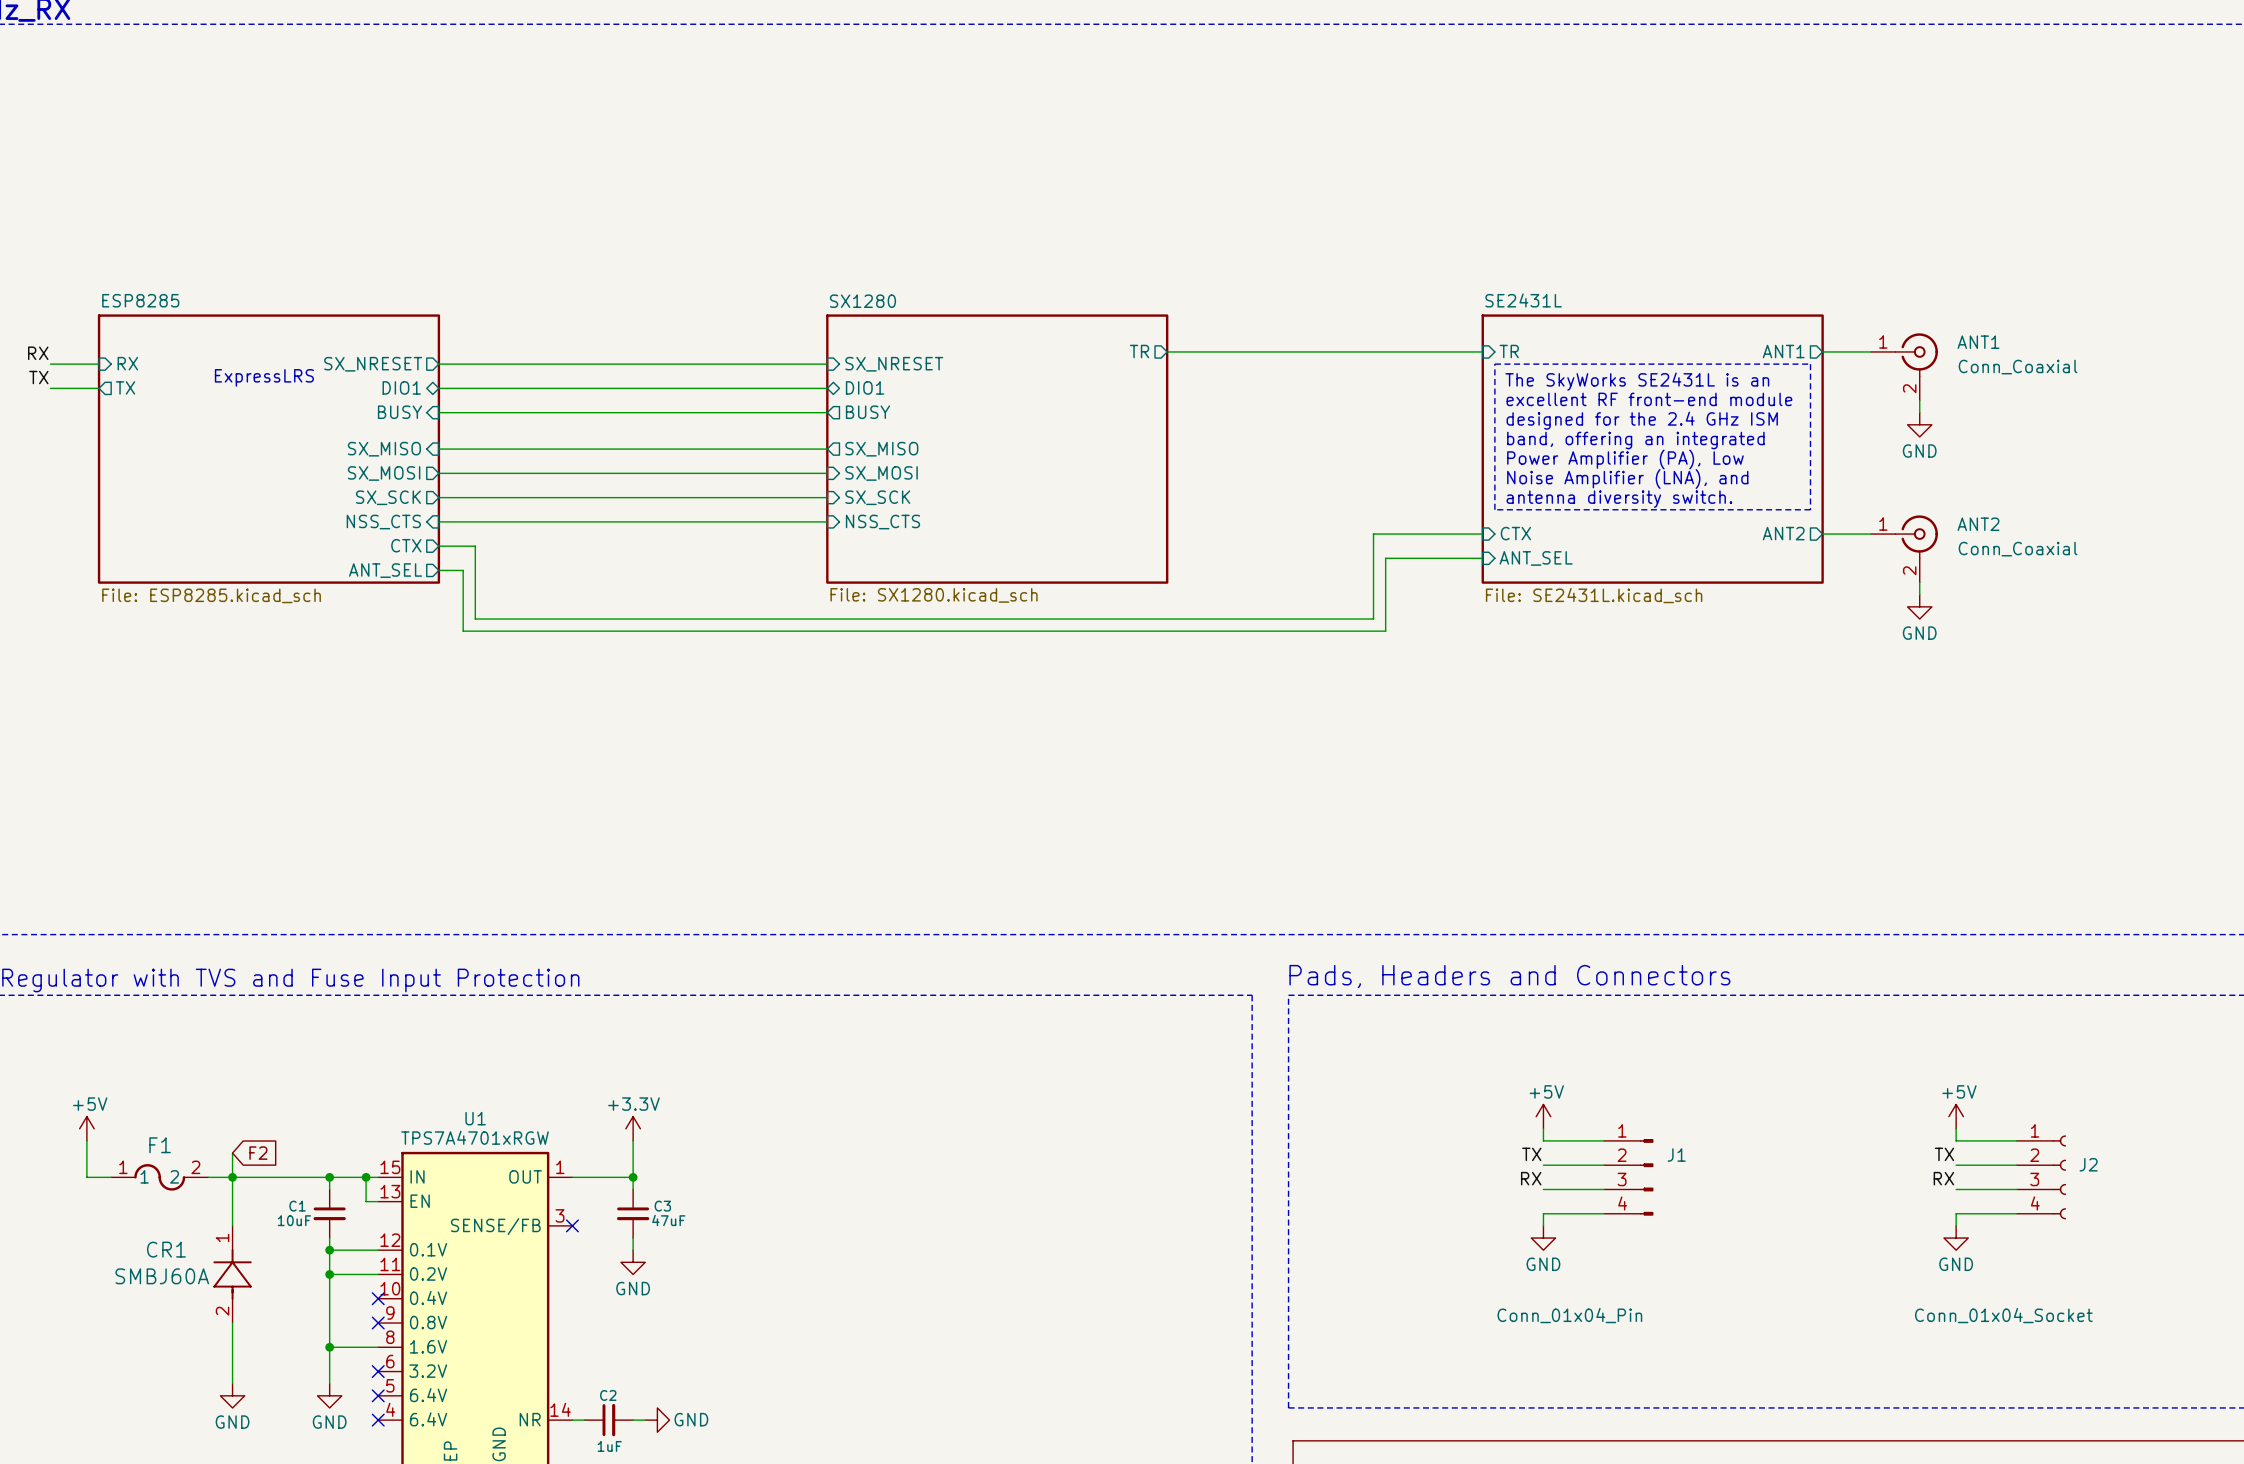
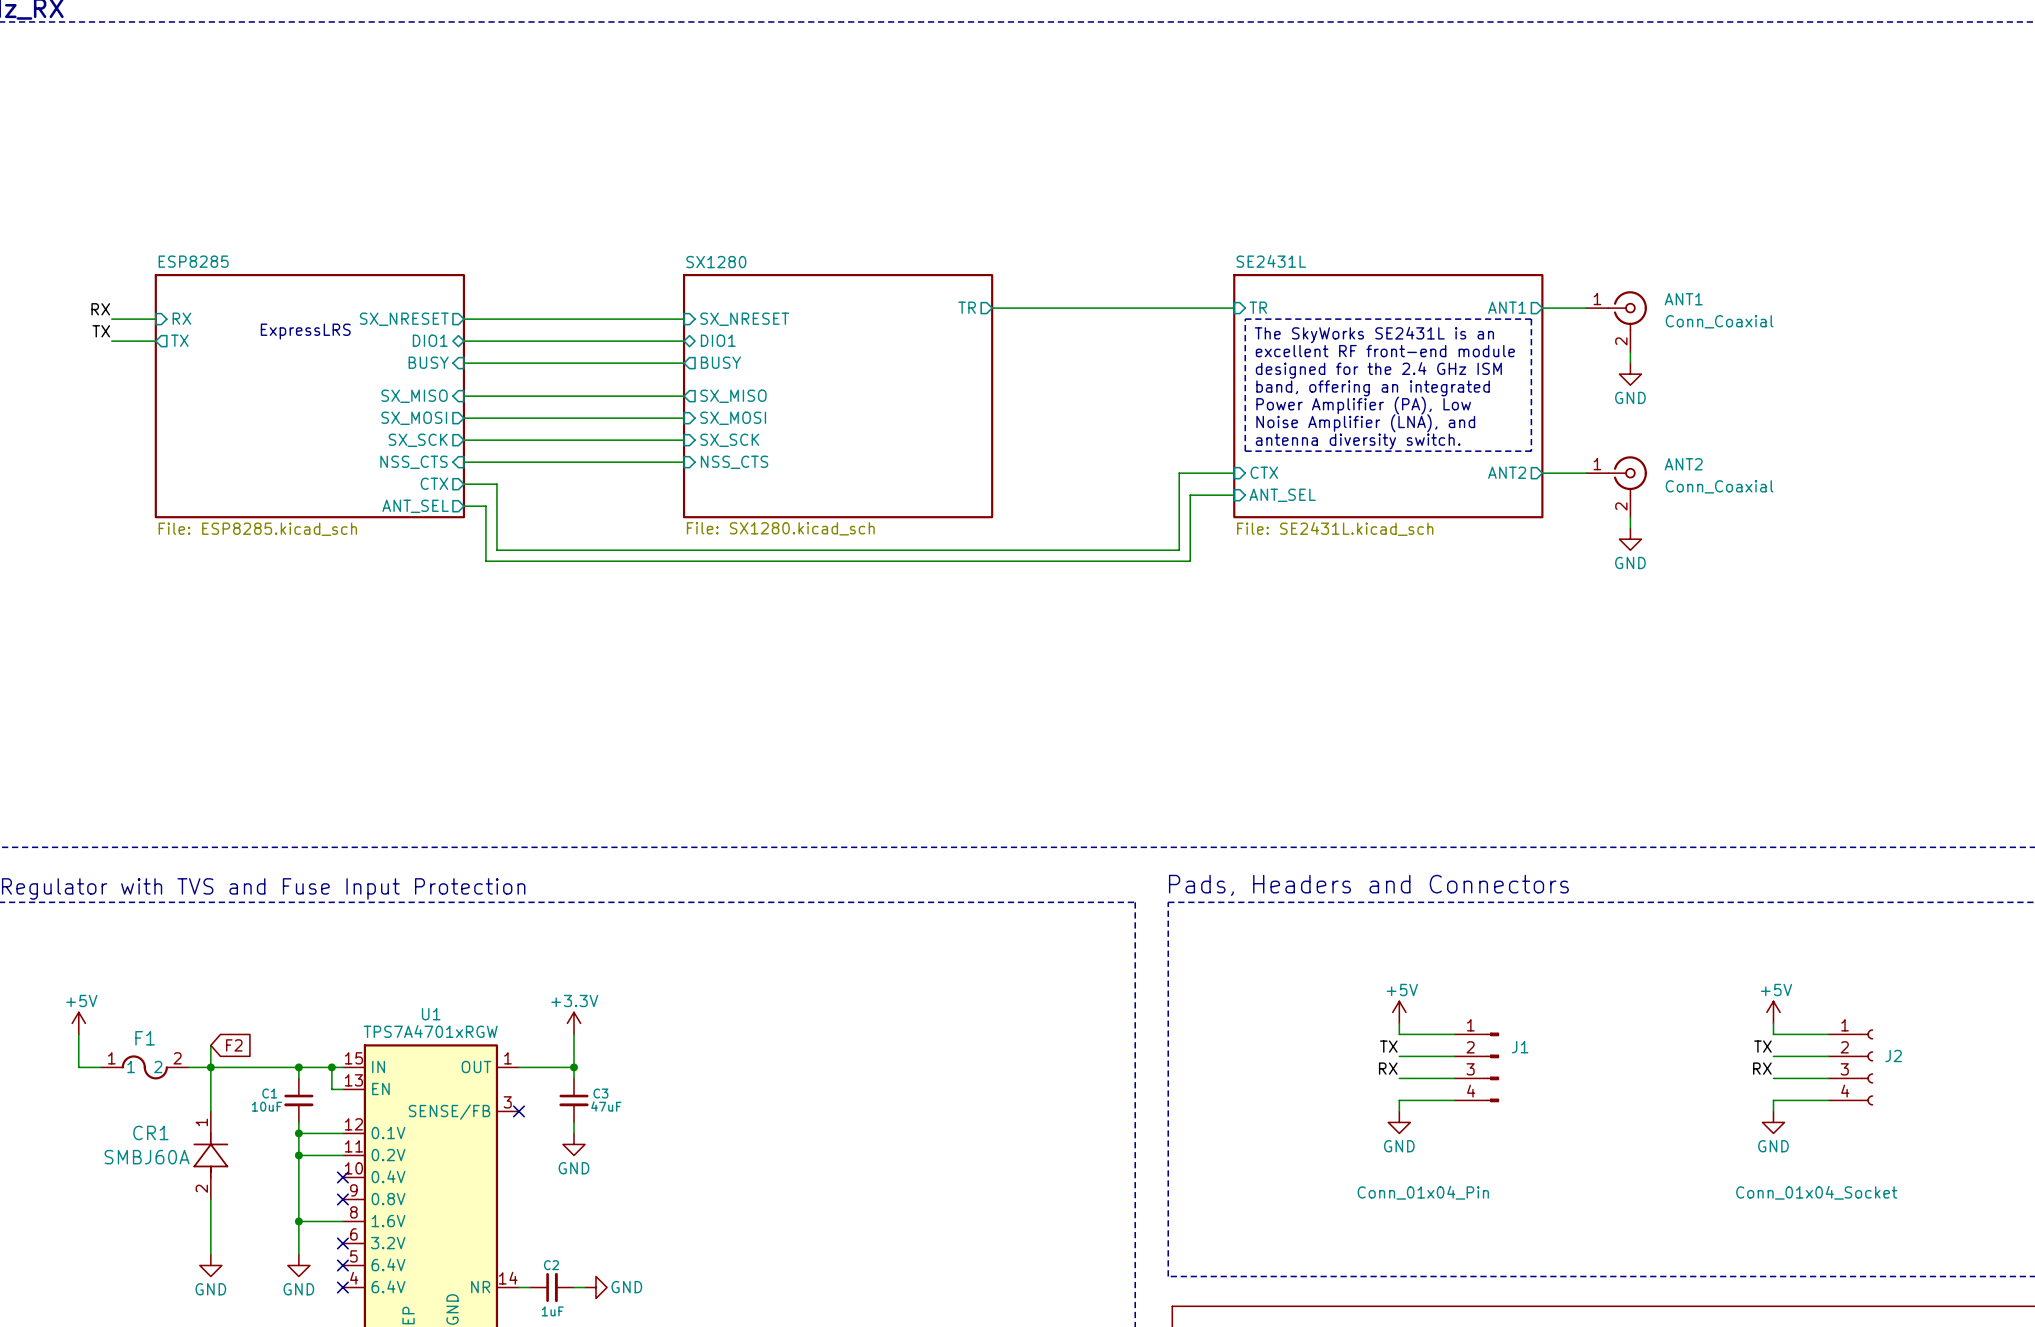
wire: none -> (992, 308) (1234, 308)
sheet pin: none -> TR (1258, 307)
wire: none -> (463, 319) (684, 319)
sheet pin position: TR (1139, 351) -> TR (967, 307)
wire: (1167, 351) (1482, 351) -> none
sheet pin: TR (1509, 351) -> none
sheet pin position: ANT1 (1783, 351) -> ANT1 (1507, 307)
wire: (1822, 351) (1871, 351) -> (1542, 308) (1586, 308)
label position: RX (38, 353) -> RX (100, 309)
sheet pin position: RX (127, 363) -> RX (181, 318)
wire: (50, 364) (99, 364) -> (111, 319) (155, 319)
sheet pin position: SX_NRESET (373, 364) -> SX_NRESET (404, 319)
wire: (438, 364) (827, 364) -> none
sheet pin position: SX_NRESET (894, 364) -> SX_NRESET (744, 319)
line: (1494, 364) (1810, 364) (1810, 509) (1494, 509) (1494, 364) -> (1245, 319) (1531, 319) (1531, 451) (1245, 451) (1245, 319)
ANT1 position: (1904, 366) -> (1616, 321)
wire: none -> (463, 341) (684, 341)
label position: TX (38, 377) -> TX (101, 331)
text position: ExpressLRS (264, 377) -> ExpressLRS (305, 331)
text position: The SkyWorks SE2431L is an (1637, 381) -> The SkyWorks SE2431L is an (1374, 334)
sheet pin position: TX (125, 387) -> TX (179, 340)
sheet pin position: DIO1 (401, 387) -> DIO1 (430, 340)
sheet pin position: DIO1 (865, 387) -> DIO1 (718, 340)
wire: (50, 388) (99, 388) -> (111, 341) (155, 341)
wire: (438, 388) (827, 388) -> none
text position: excellent RF front-end module (1649, 399) -> excellent RF front-end module (1385, 351)
wire: none -> (463, 363) (684, 363)
wire: (1919, 400) (1919, 412) -> (1630, 352) (1630, 363)
sheet pin position: BUSY (399, 412) -> BUSY (428, 362)
wire: (438, 412) (827, 412) -> none
sheet pin position: BUSY (867, 412) -> BUSY (720, 362)
power symbol: none -> GND (1630, 374)
text position: designed for the 2.4 GHz ISM (1642, 420) -> designed for the 2.4 GHz ISM (1378, 370)
power symbol: GND (1919, 424) -> none
wire: none -> (463, 396) (684, 396)
text position: band, offering an integrated (1635, 440) -> band, offering an integrated (1373, 388)
sheet ESP8285 position: (268, 449) -> (309, 396)
sheet pin position: SX_MISO (384, 449) -> SX_MISO (414, 396)
wire: (438, 449) (827, 449) -> none
sheet pin position: SX_MISO (881, 449) -> SX_MISO (733, 396)
sheet SX1280 position: (997, 449) -> (838, 396)
sheet SE2431L position: (1652, 449) -> (1388, 396)
text position: Power Amplifier (PA), Low (1625, 459) -> Power Amplifier (PA), Low (1363, 405)
wire: none -> (463, 418) (684, 418)
sheet pin position: SX_MOSI (384, 473) -> SX_MOSI (414, 418)
wire: (438, 473) (827, 473) -> none
sheet pin position: SX_MOSI (881, 473) -> SX_MOSI (733, 418)
text position: Noise Amplifier (LNA), and (1627, 479) -> Noise Amplifier (LNA), and (1365, 423)
wire: none -> (463, 440) (684, 440)
sheet pin position: SX_SCK (388, 497) -> SX_SCK (418, 440)
wire: (438, 497) (827, 497) -> none
sheet pin position: SX_SCK (877, 497) -> SX_SCK (729, 440)
text position: antenna diversity switch. (1619, 499) -> antenna diversity switch. (1358, 441)
wire: none -> (463, 462) (684, 462)
wire: (438, 521) (827, 521) -> none
wire: none -> (1234, 473) (1179, 473) (1179, 550) (496, 550) (496, 484) (463, 484)
sheet pin position: NSS_CTS (383, 522) -> NSS_CTS (413, 462)
sheet pin position: NSS_CTS (882, 522) -> NSS_CTS (734, 462)
sheet pin position: CTX (1515, 533) -> CTX (1264, 472)
sheet pin position: ANT2 (1783, 533) -> ANT2 (1507, 472)
wire: (1482, 534) (1373, 534) (1373, 619) (1312, 619) -> (1234, 495) (1190, 495) (1190, 561)
wire: (1822, 534) (1871, 534) -> (1542, 473) (1586, 473)
sheet pin position: CTX (406, 545) -> CTX (434, 483)
wire: (438, 546) (475, 546) (475, 619) (536, 619) -> (463, 506) (485, 506) (485, 561)
ANT2 position: (1904, 548) -> (1616, 486)
wire: (1482, 558) (1385, 558) (1385, 631) (463, 631) (463, 570) (438, 570) -> none
sheet pin position: ANT_SEL (1536, 558) -> ANT_SEL (1282, 495)
sheet pin position: ANT_SEL (385, 570) -> ANT_SEL (415, 506)
wire: (1919, 582) (1919, 594) -> (1630, 517) (1630, 528)
power symbol: none -> GND (1630, 539)
power symbol: GND (1919, 606) -> none

